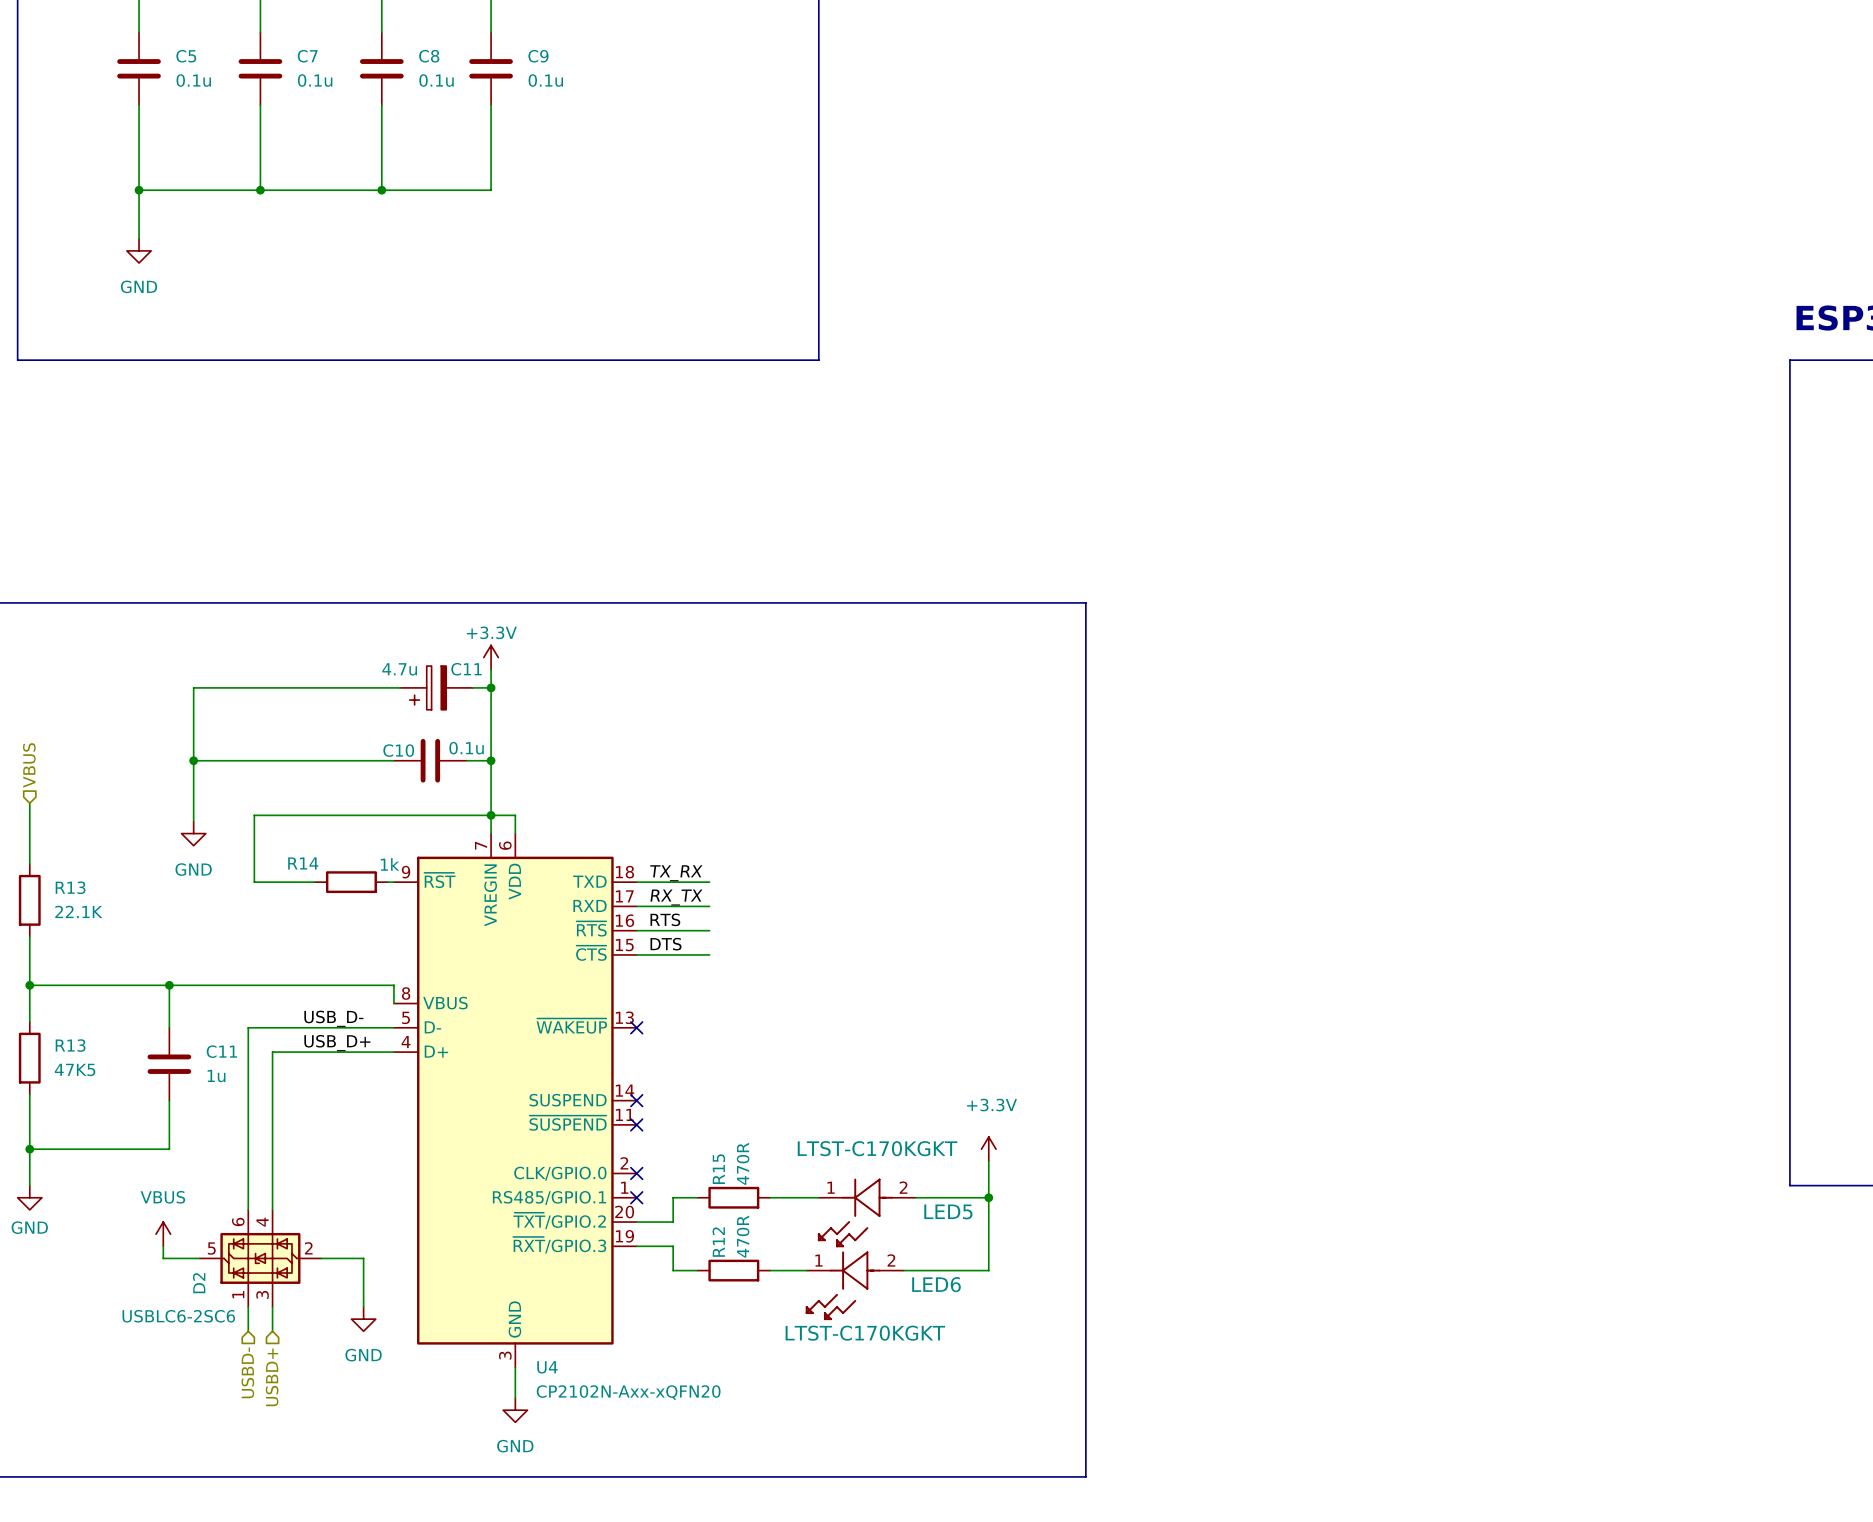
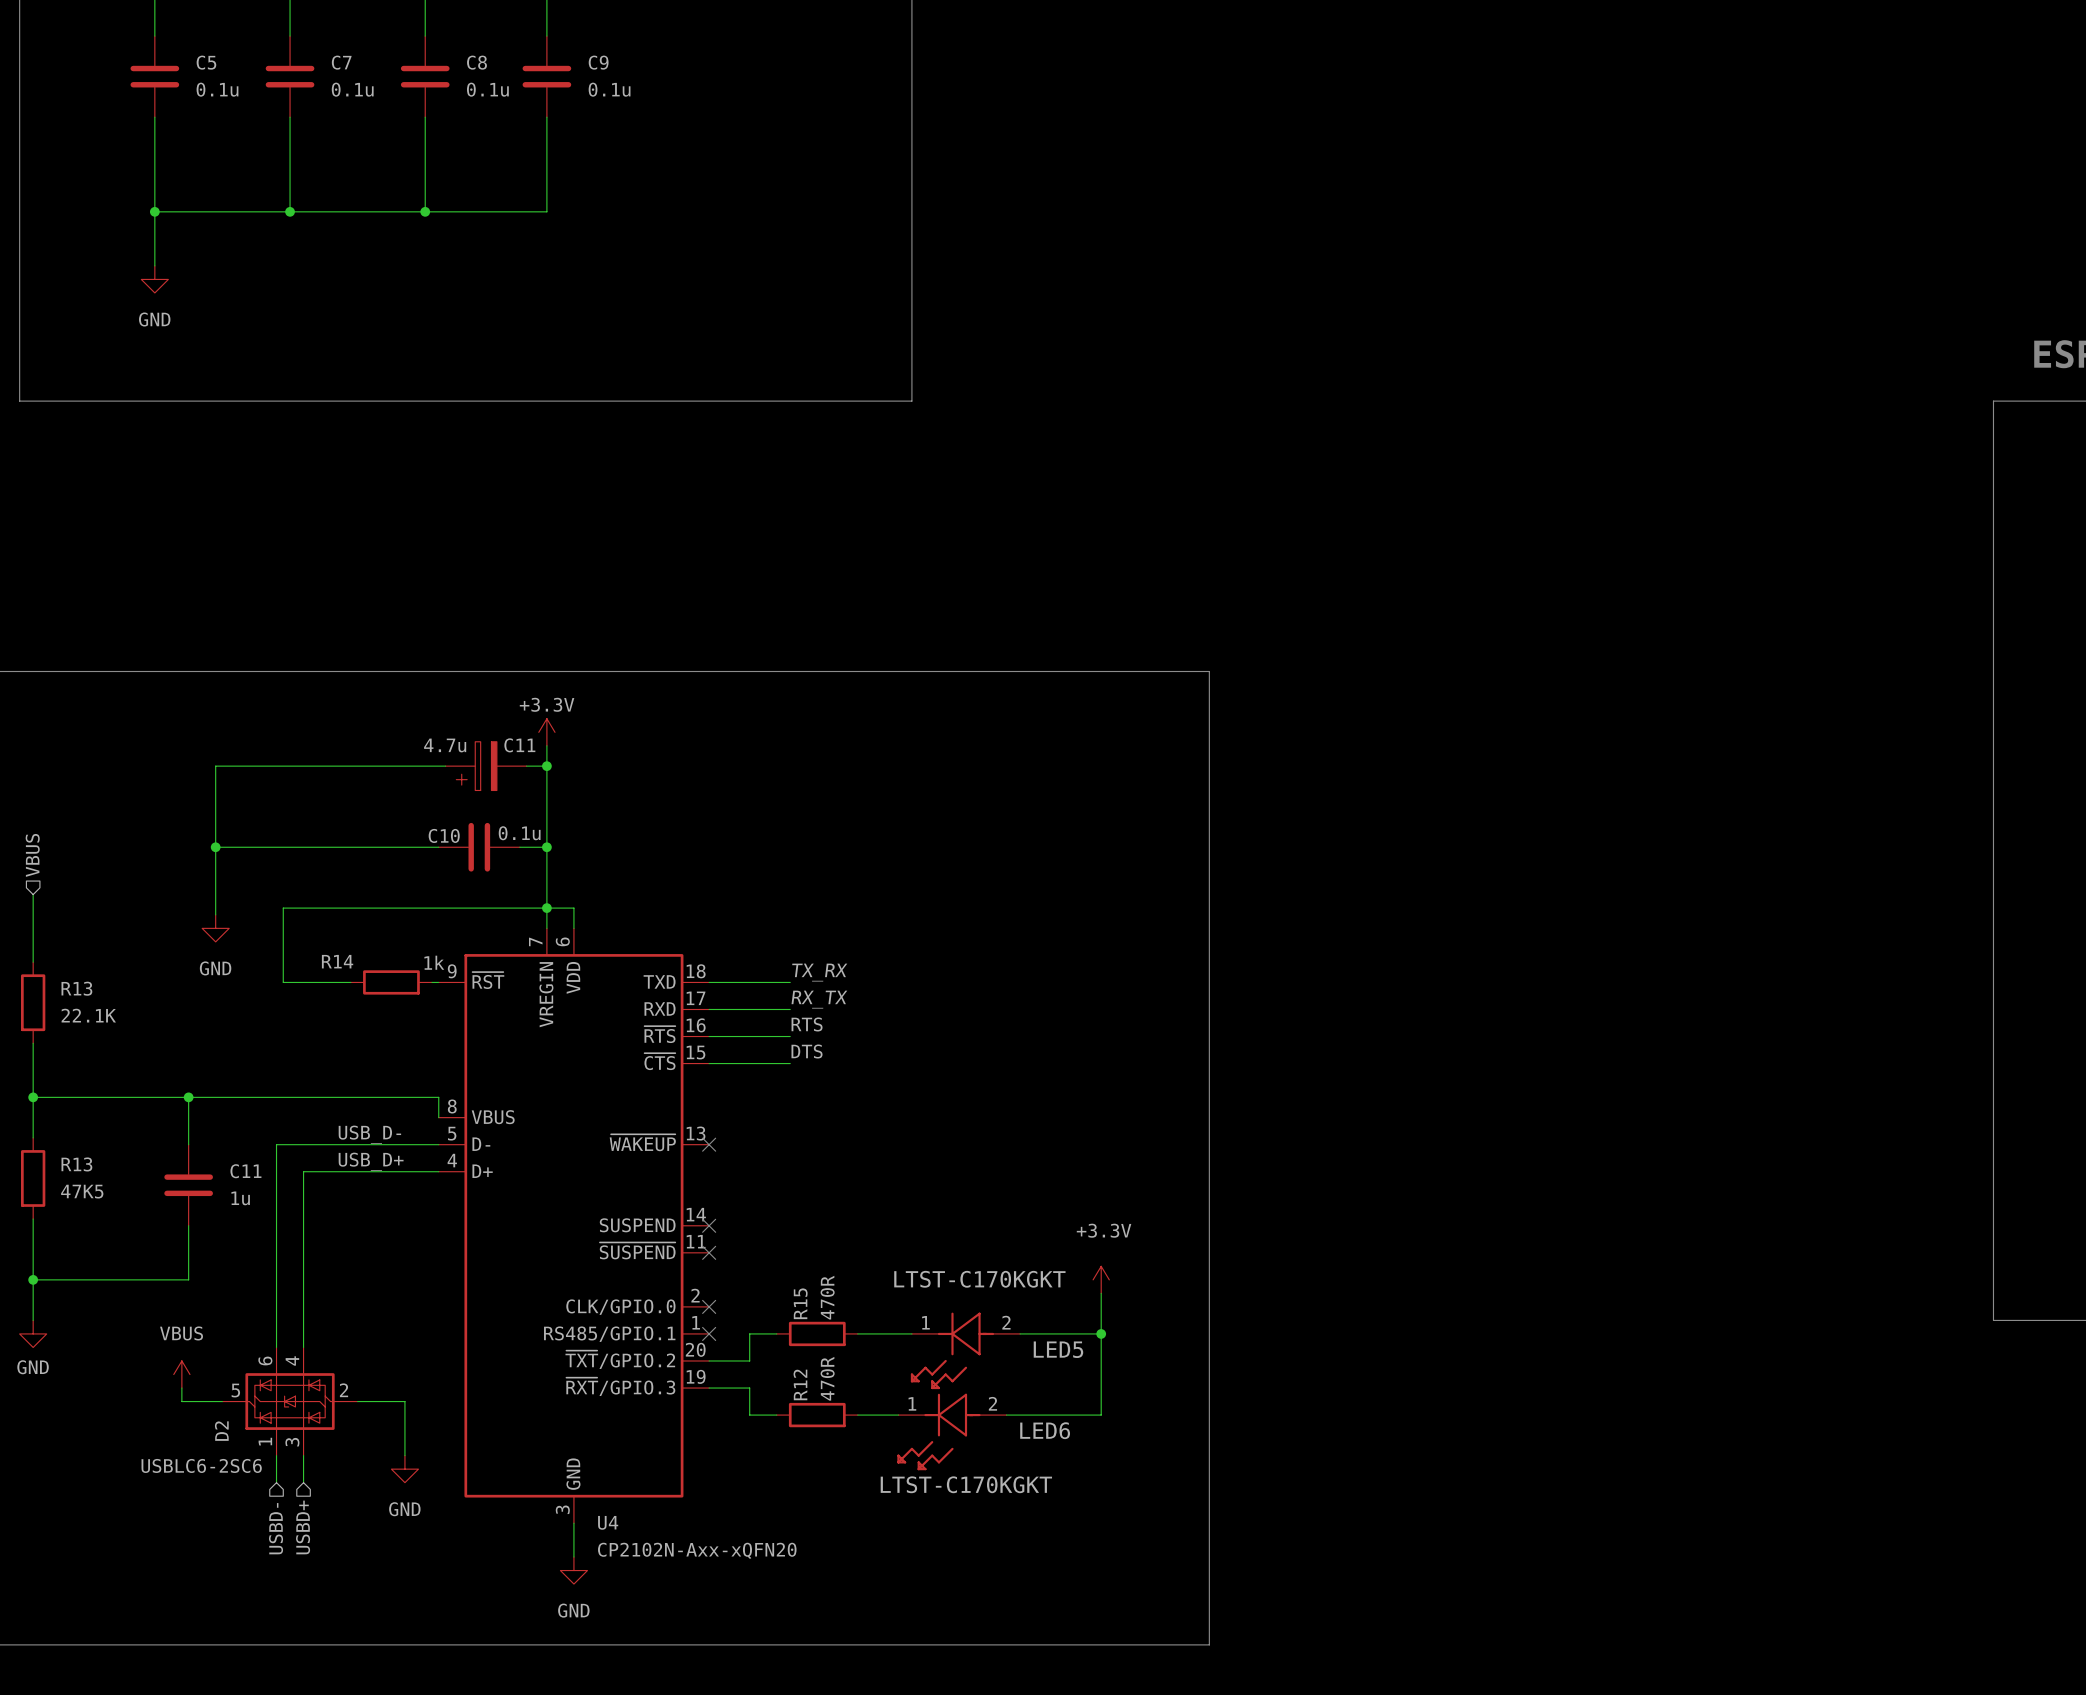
label position: TX_RX (676, 873) -> TX_RX (819, 972)
label position: RX_TX (676, 897) -> RX_TX (819, 999)
label position: RTS (665, 919) -> RTS (807, 1024)
label position: DTS (666, 944) -> DTS (807, 1051)

